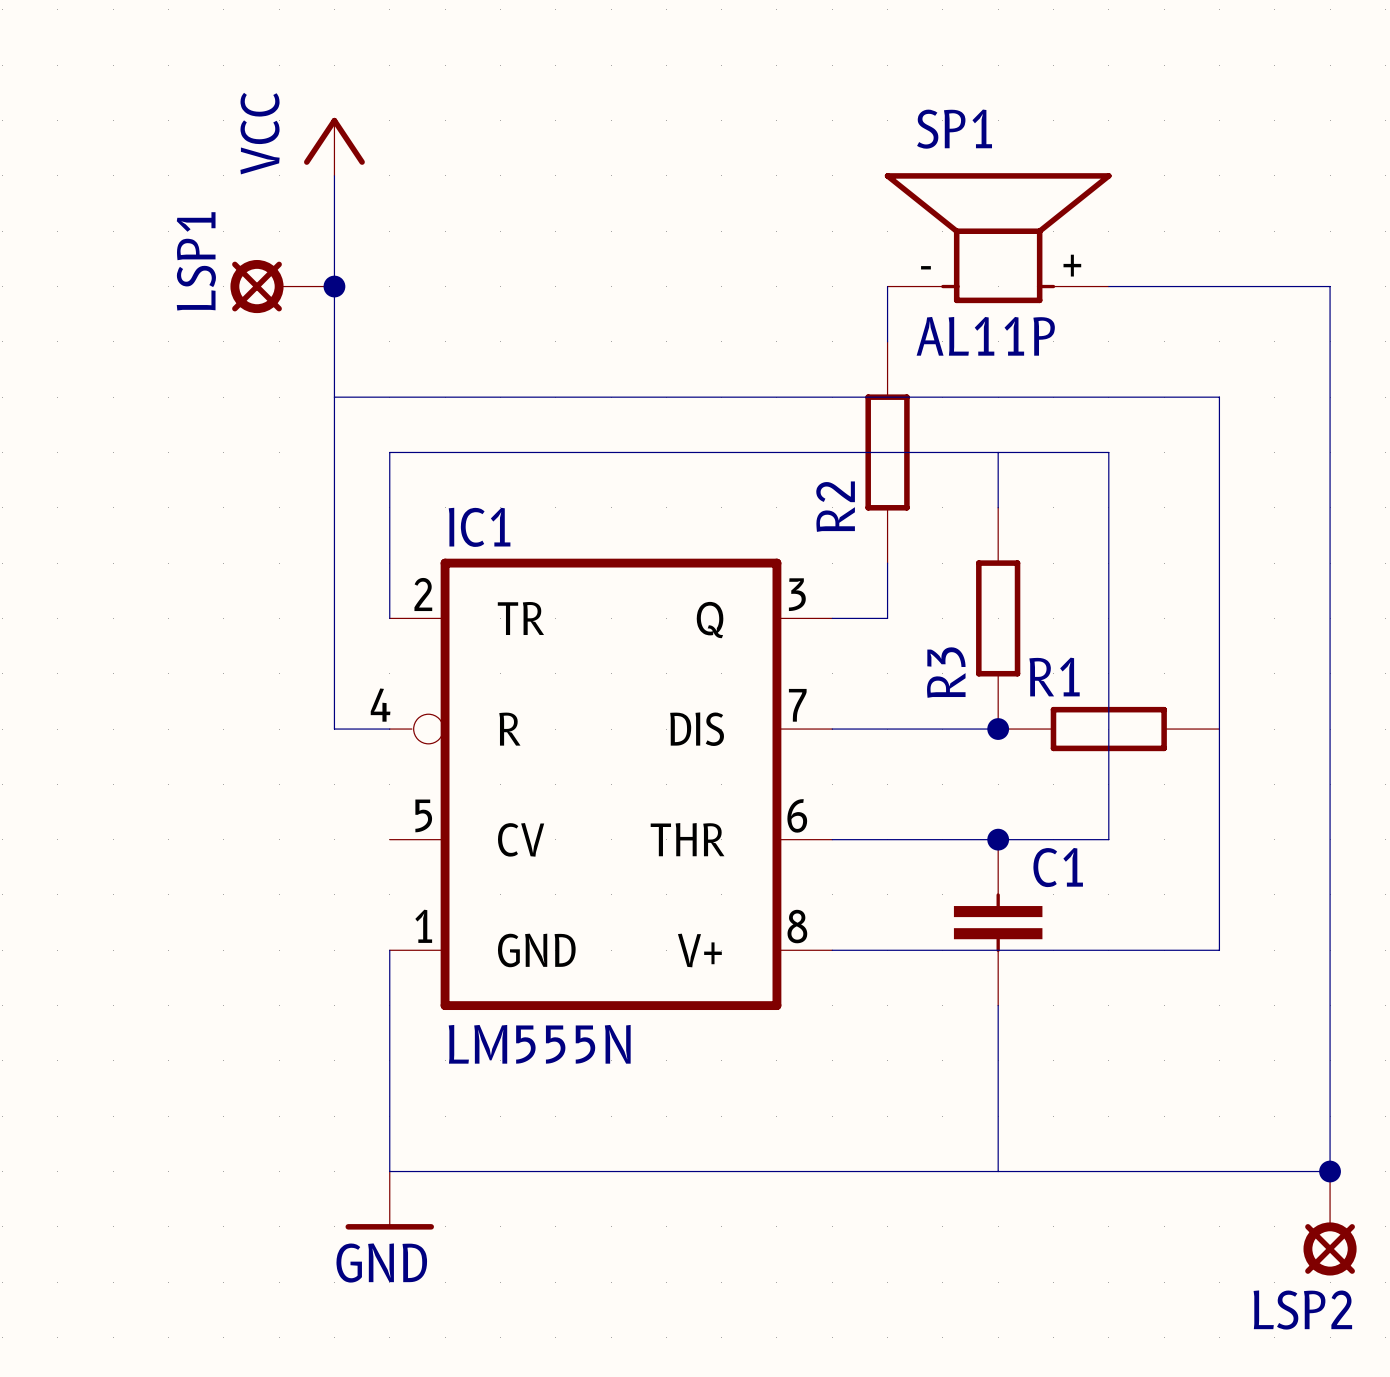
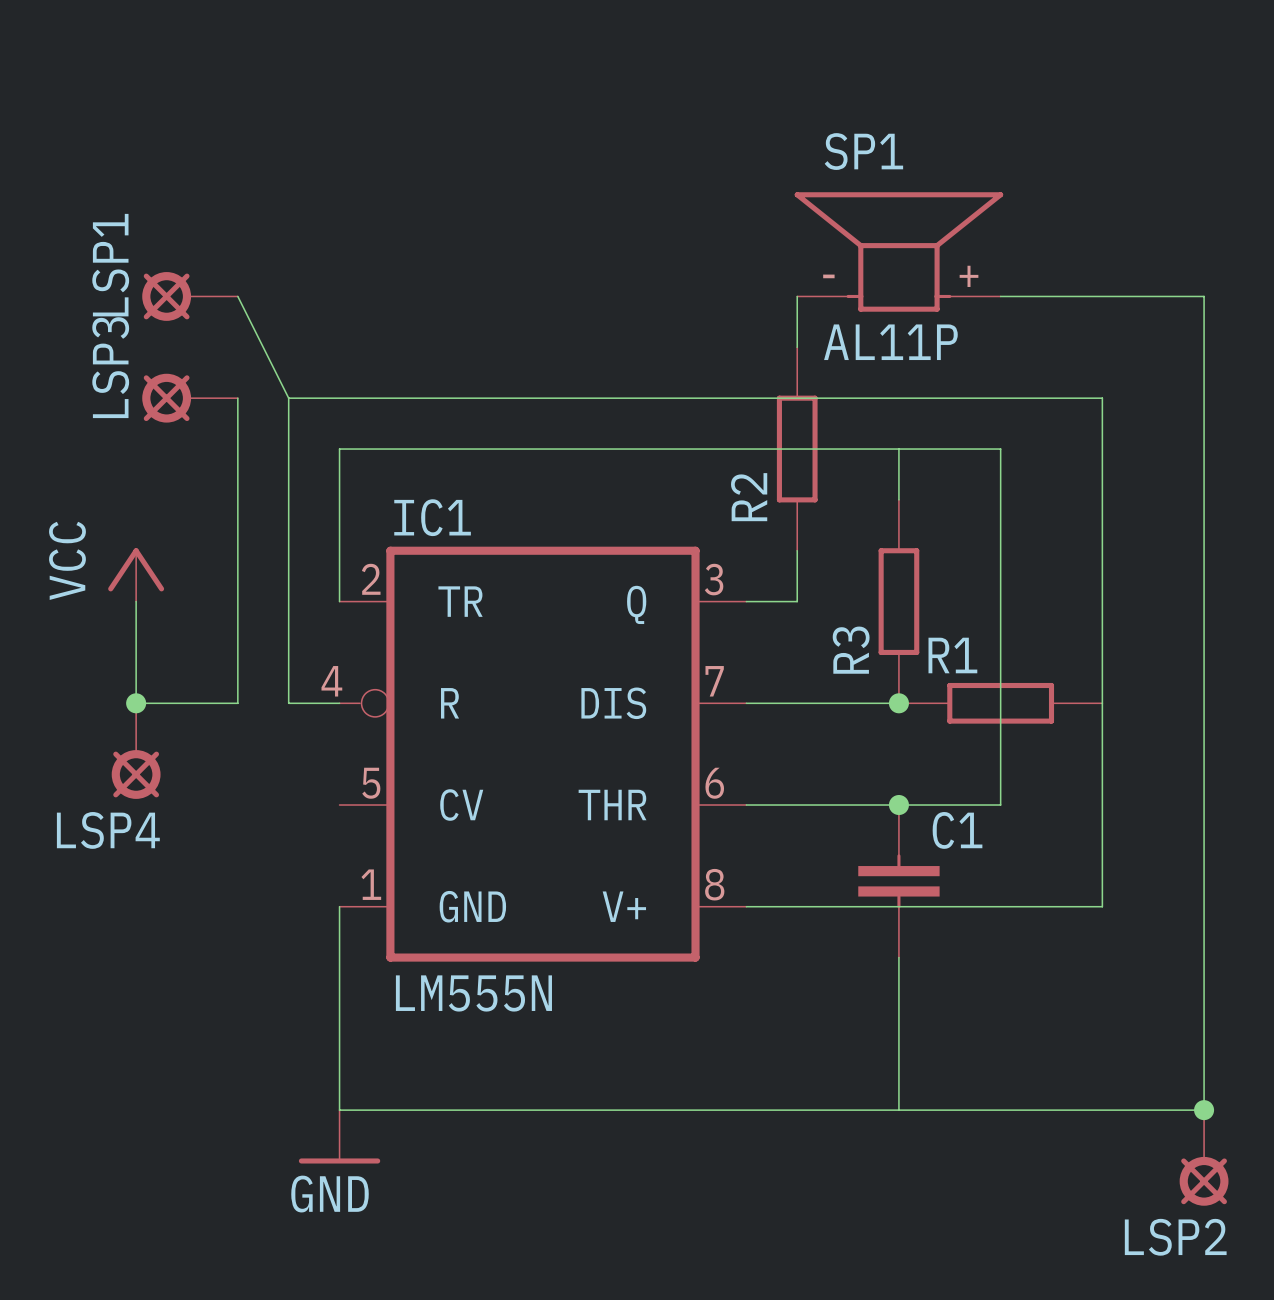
power symbol position: VCC (334, 146) -> VCC (136, 574)
wire: (334, 175) (334, 397) -> (237, 296) (288, 398)
LSP1 position: (282, 286) -> (190, 296)
junction: (334, 286) -> none
LSP3: none -> (190, 398)
wire: none -> (237, 398) (237, 703) (136, 703) (136, 601)
junction: none -> (136, 703)
LSP4: none -> (136, 751)

